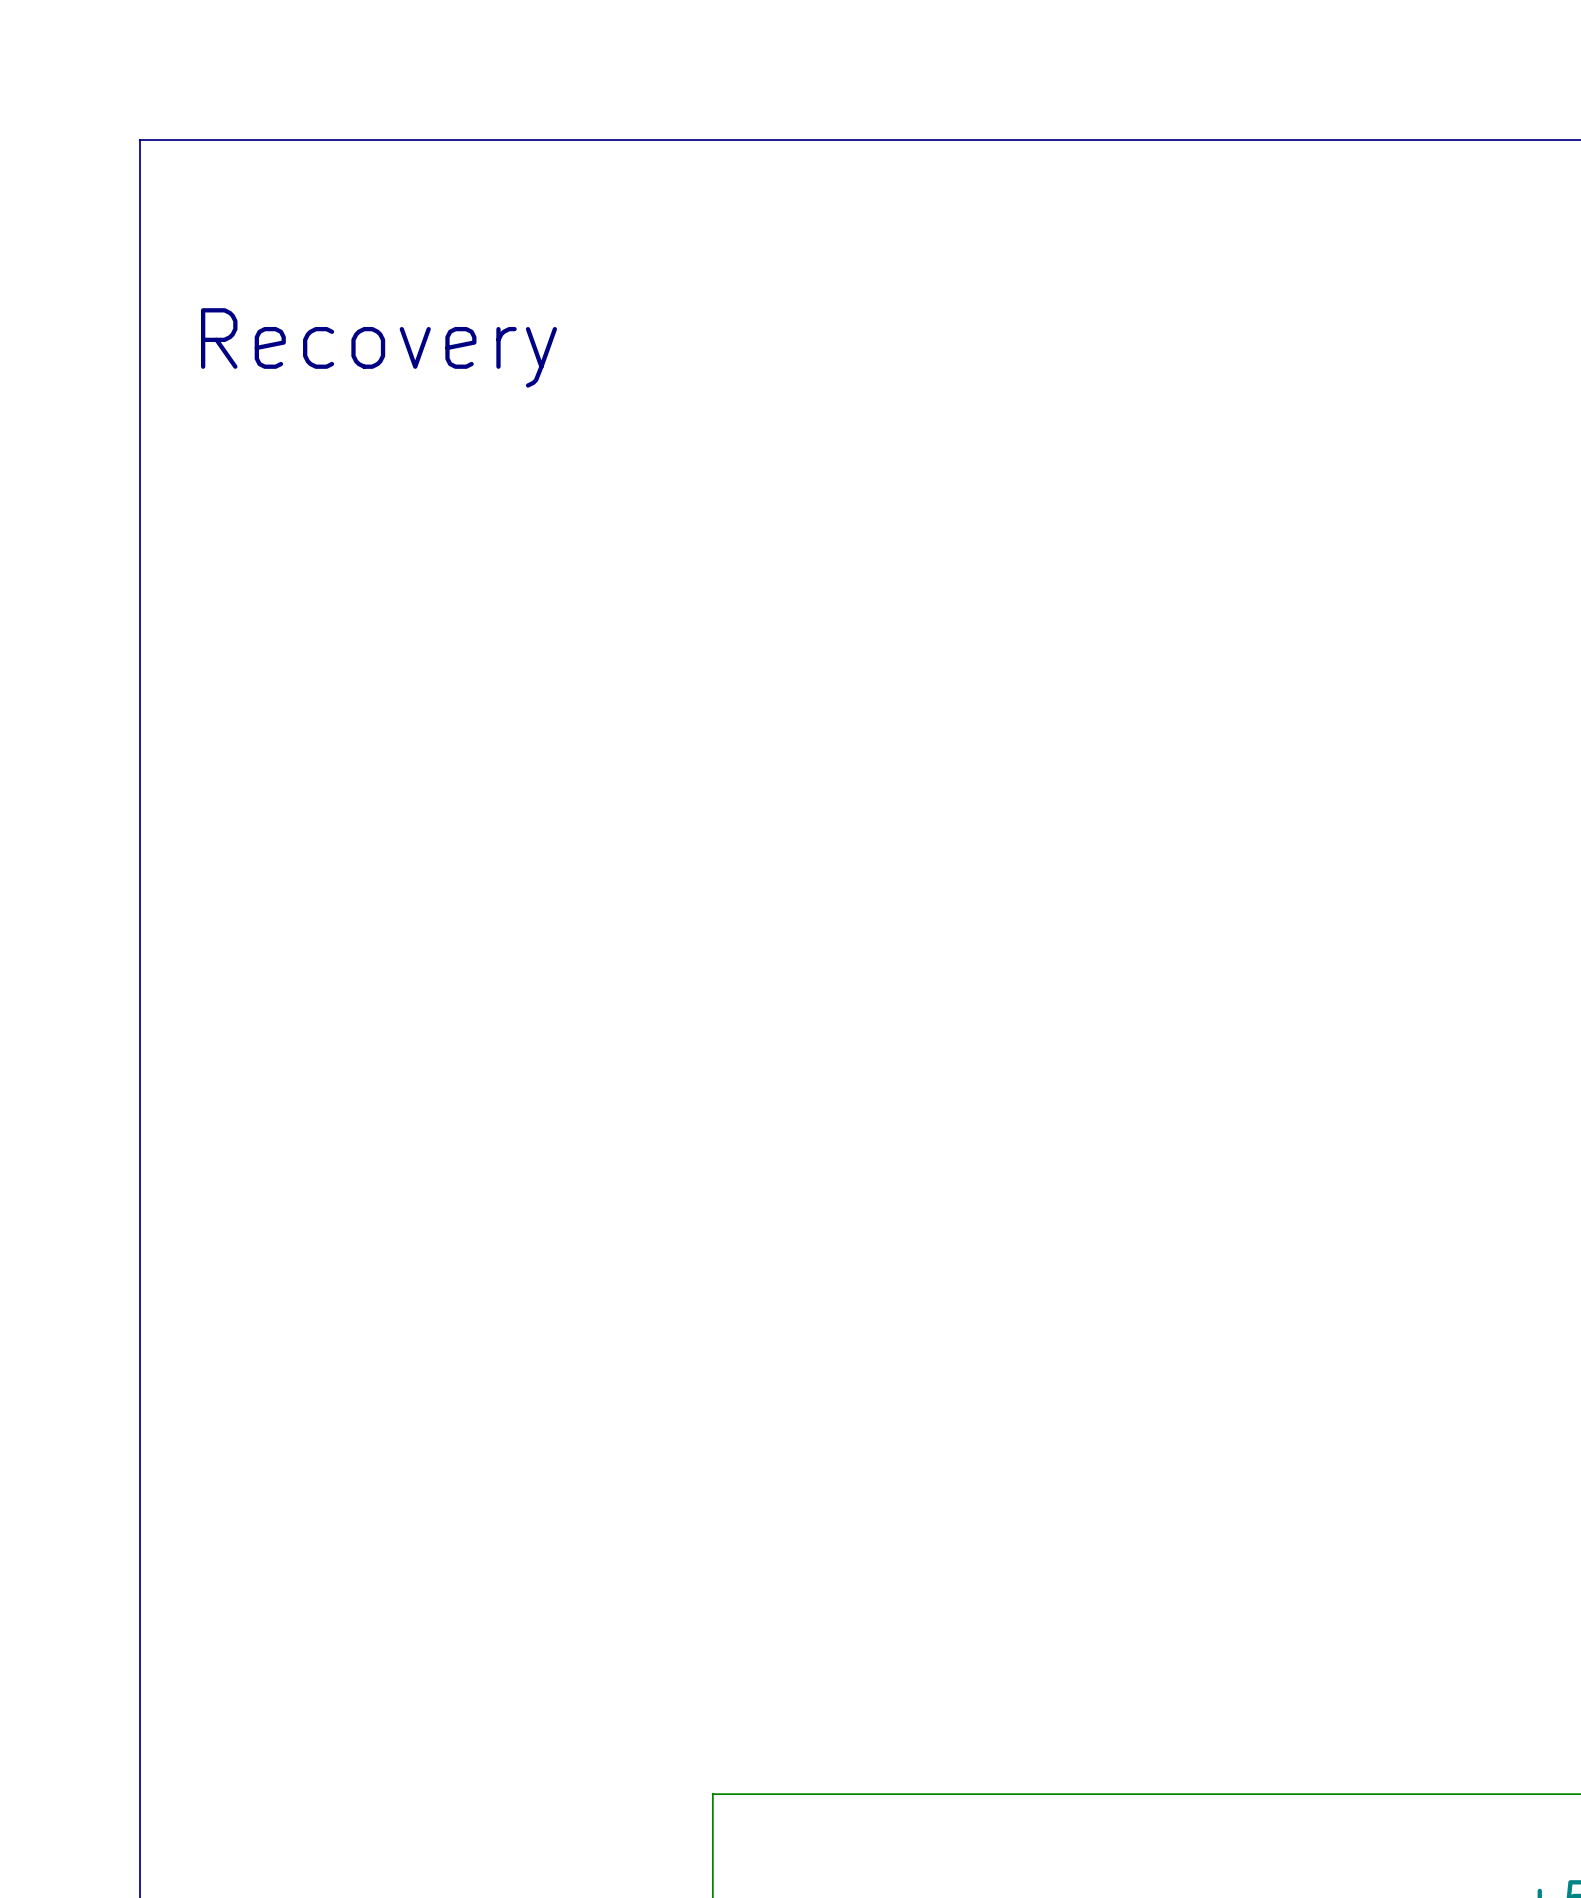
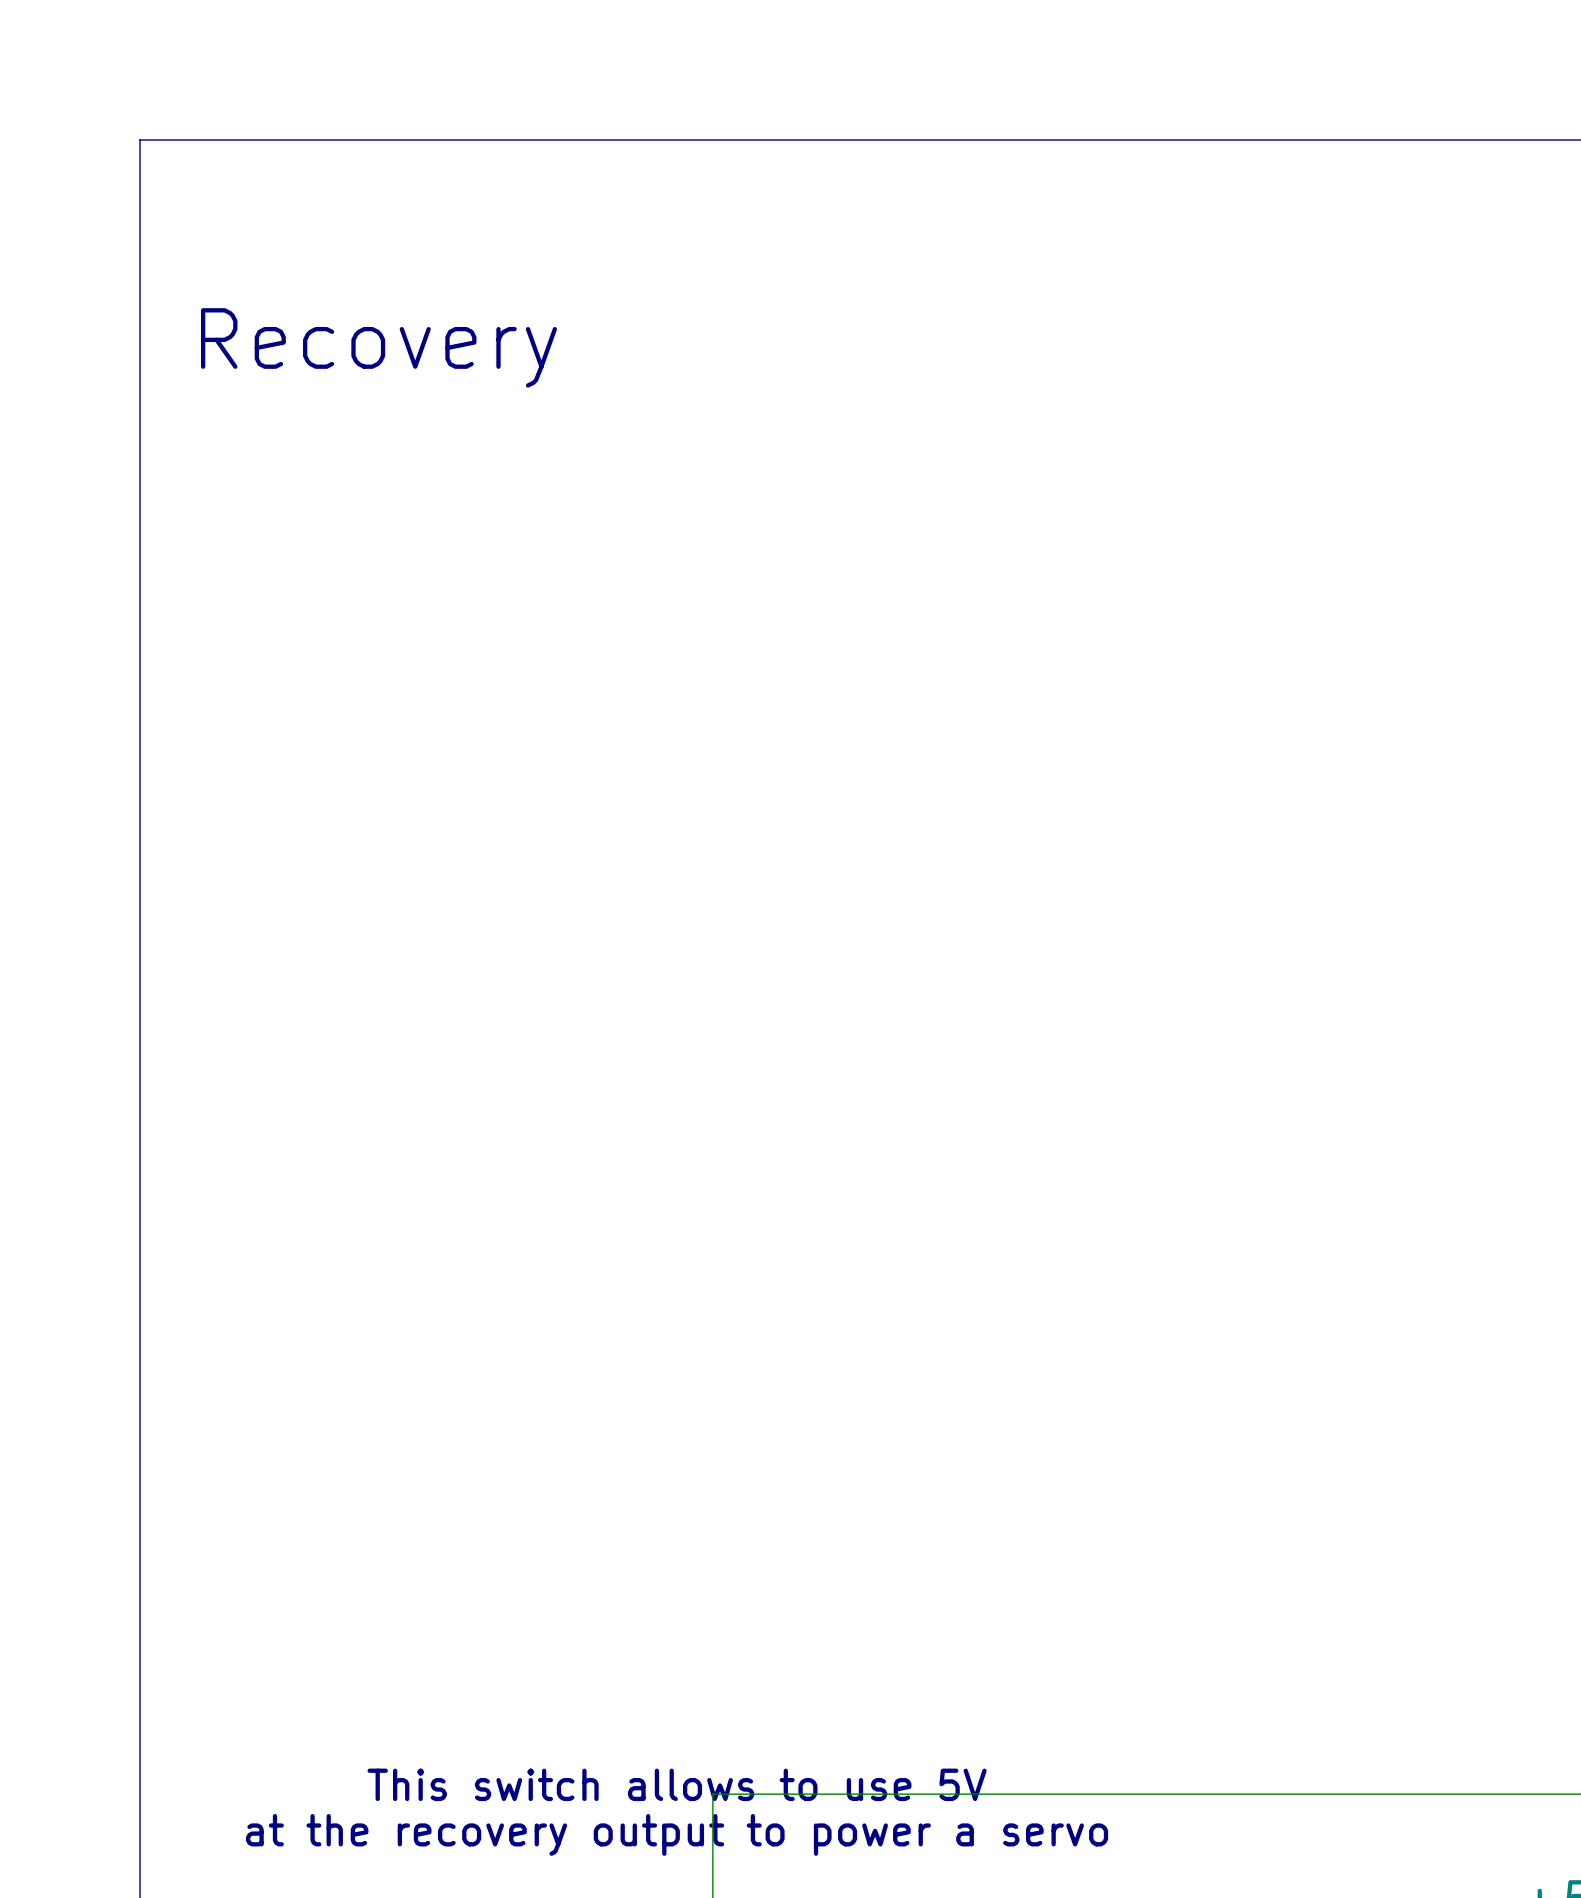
text: none -> This switch allows to use 5V (677, 1784)
text: none -> at the recovery output to power a servo (677, 1834)

